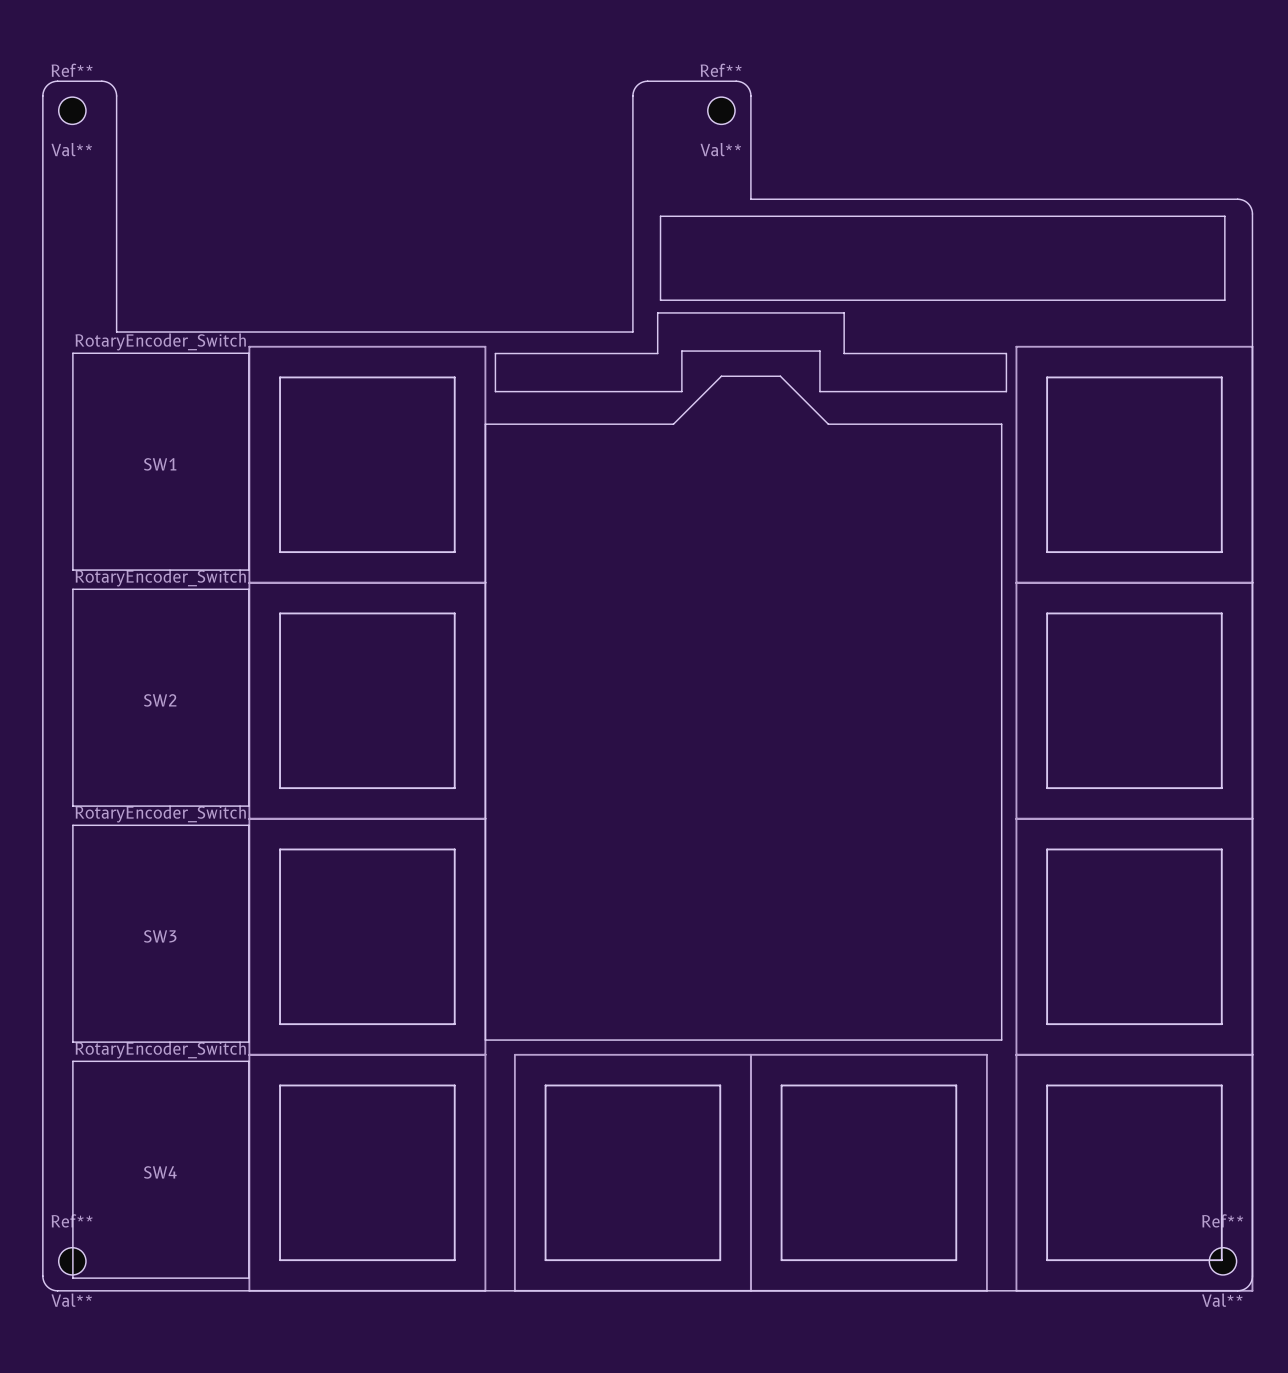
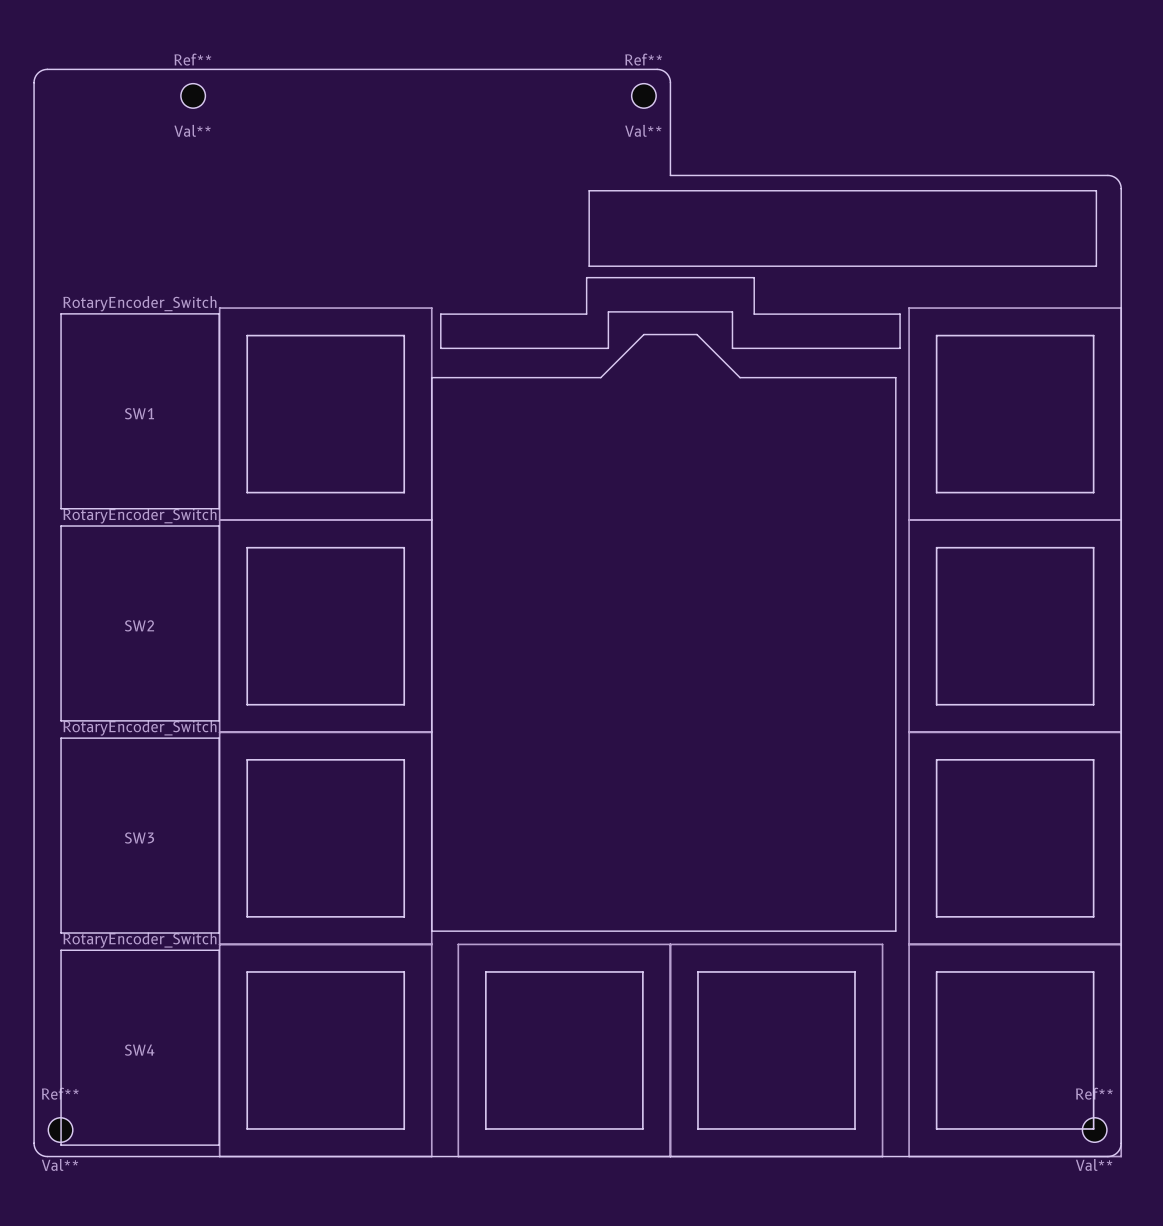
board edge: (101, 81) (112, 85) (116, 95) (116, 332) (632, 332) (632, 95) (637, 85) (647, 81) -> (87, 69) (577, 69)
Ref** position: (72, 110) -> (193, 95)

